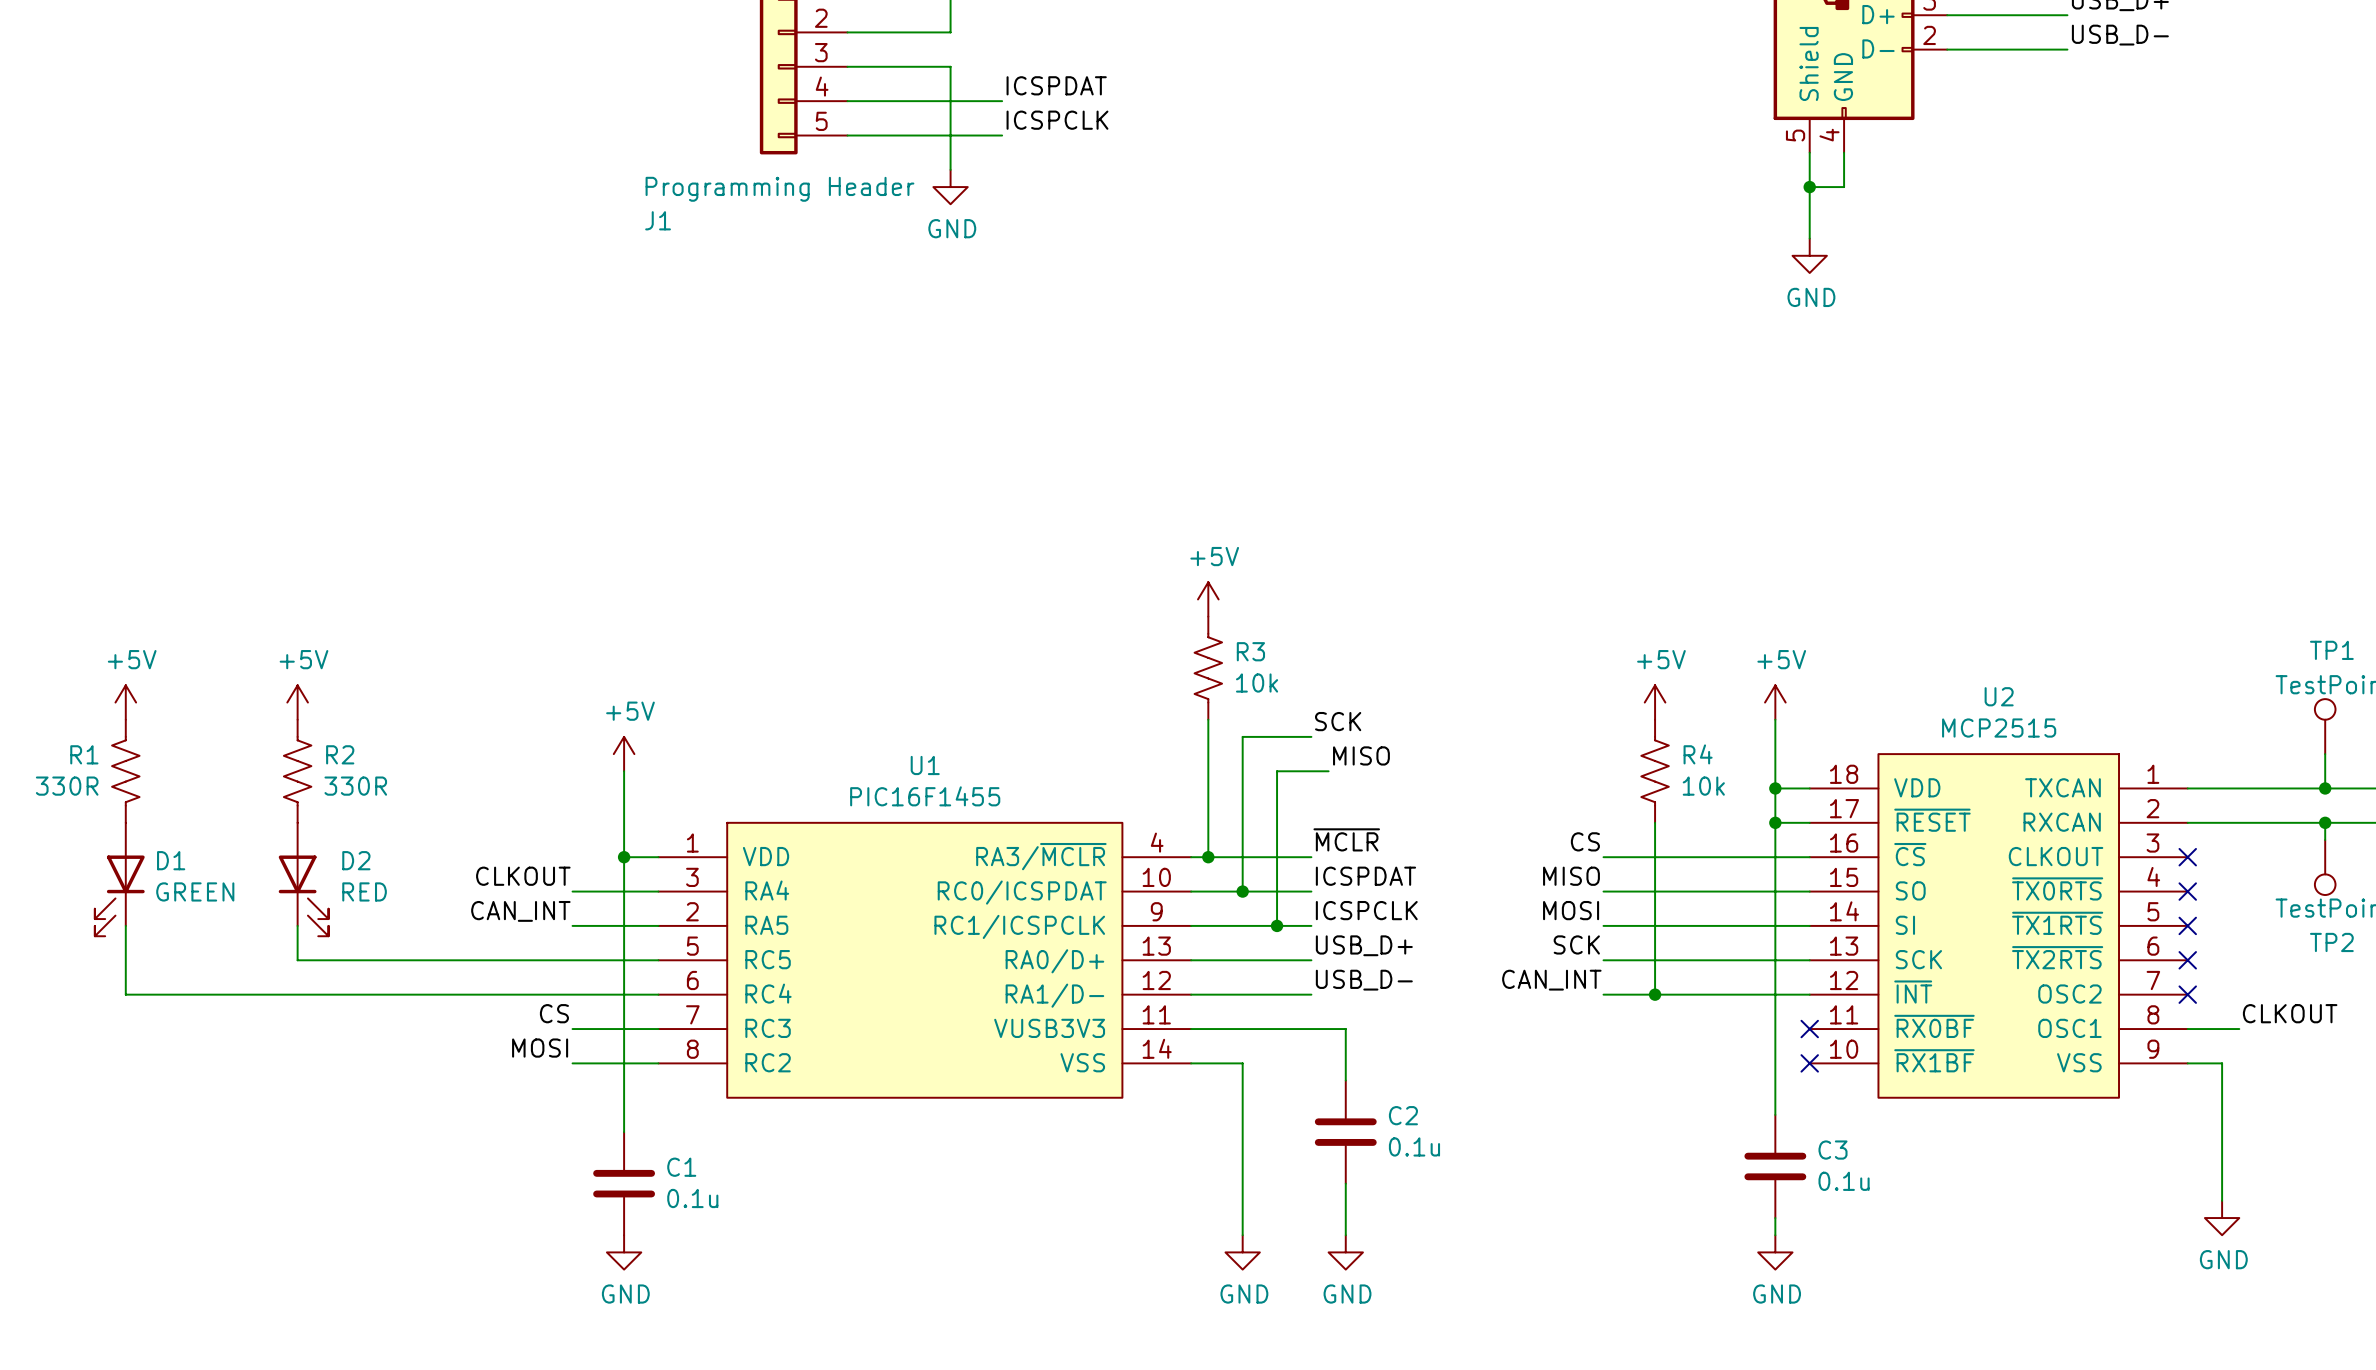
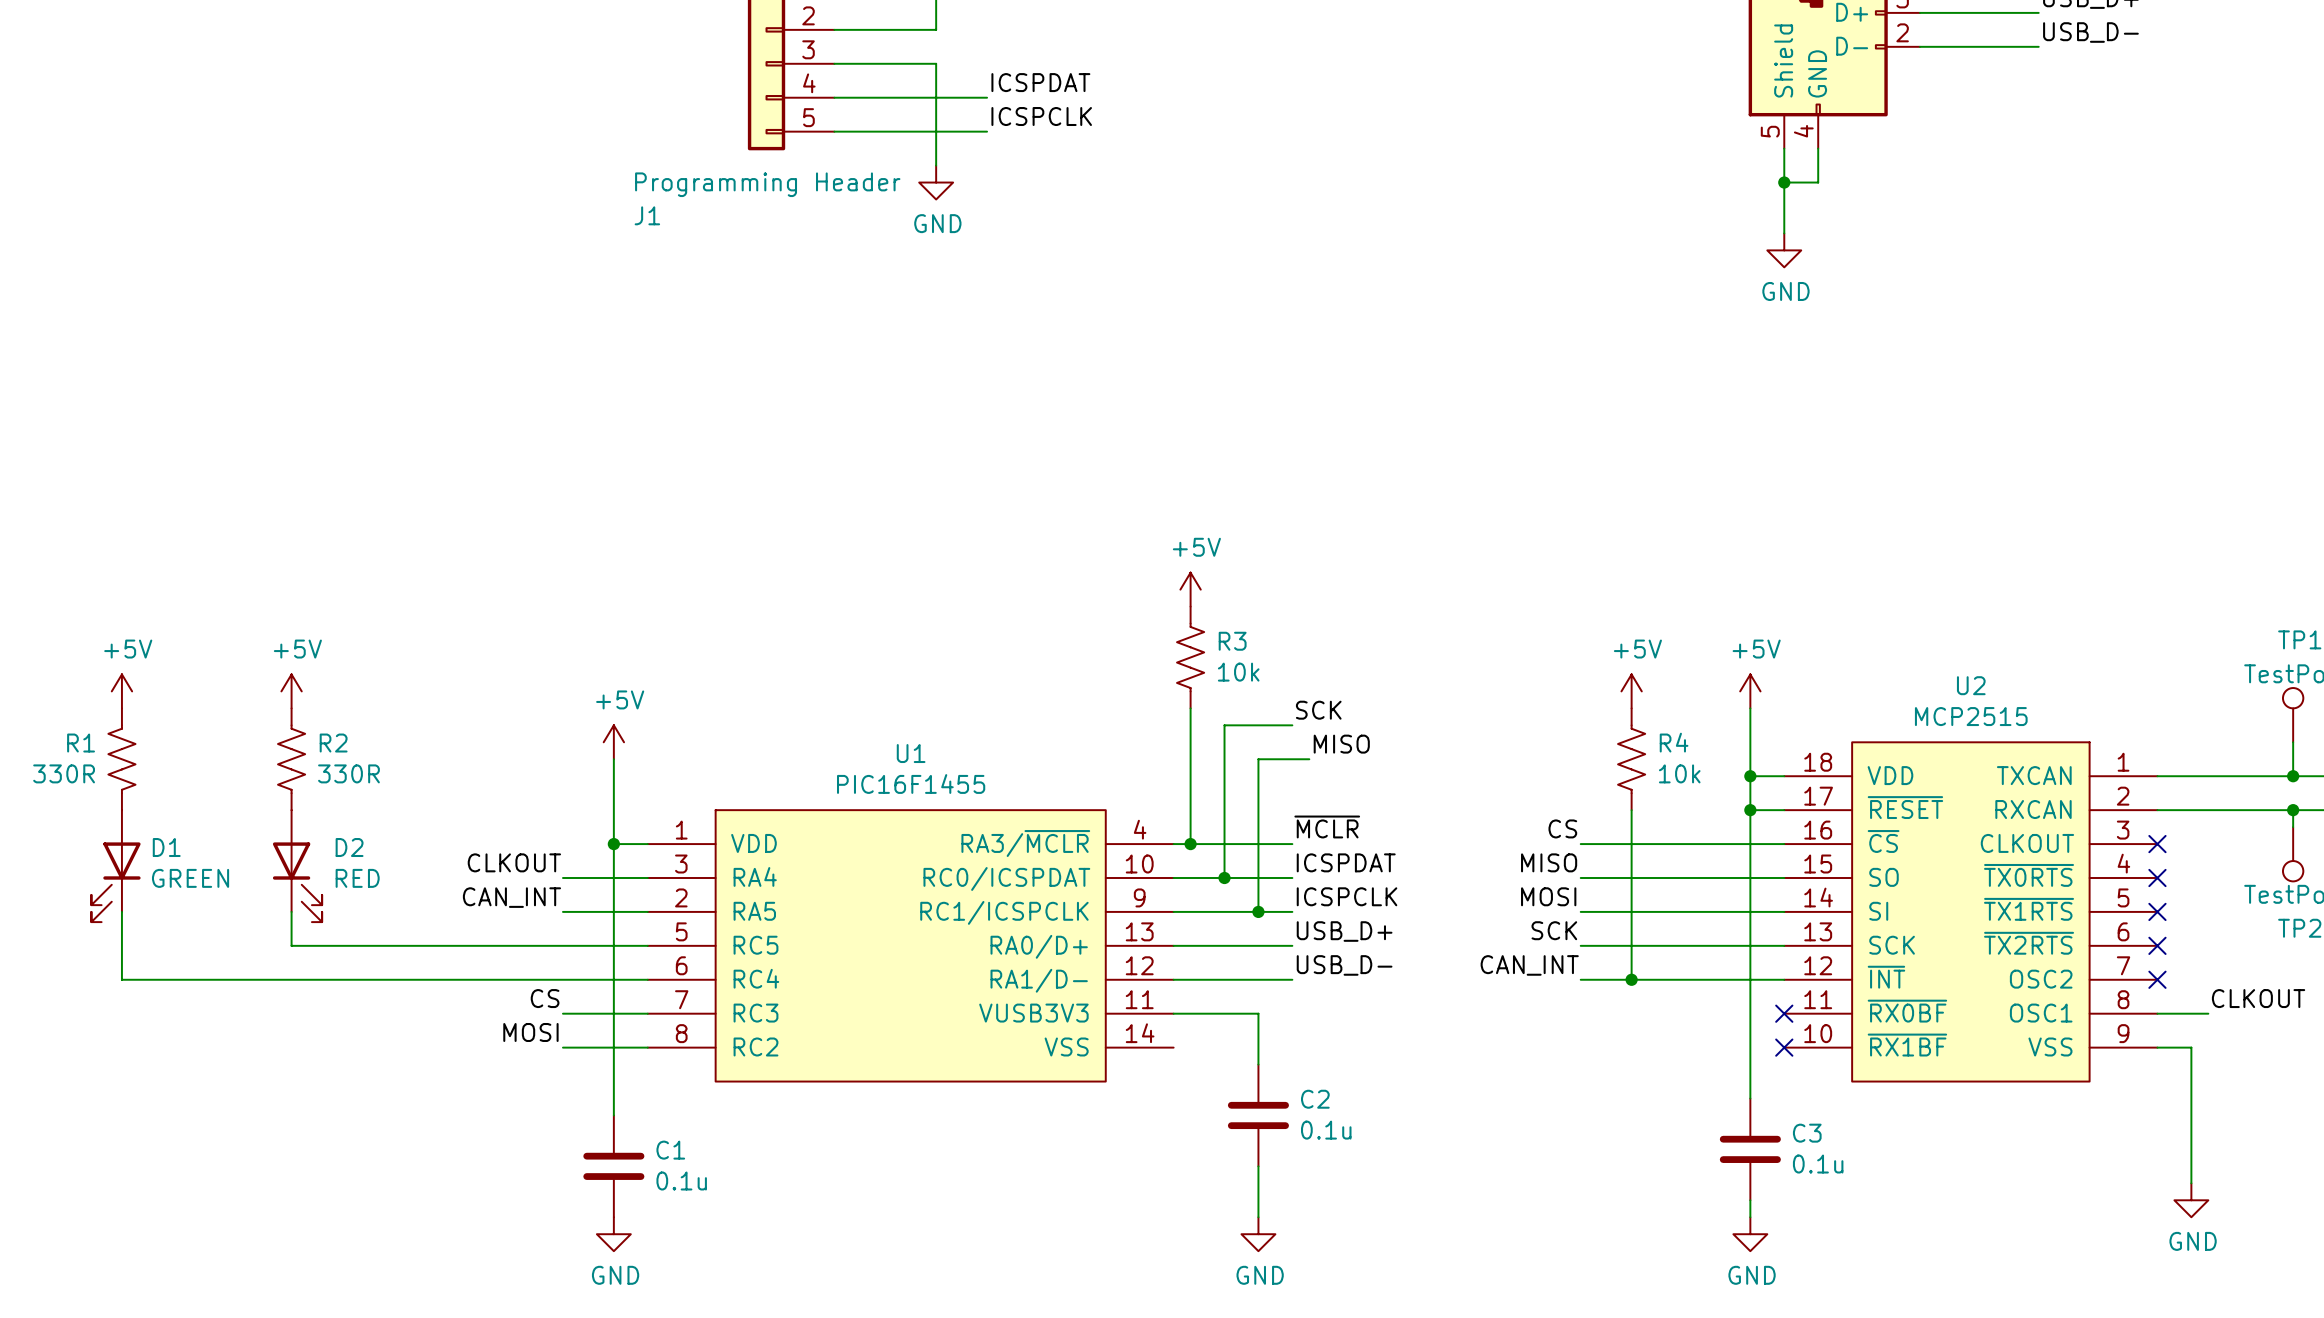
wire: (1277, 1029) (1345, 1029) (1345, 1080) -> (1258, 1013) (1258, 1064)
wire: (1191, 1063) (1242, 1063) (1242, 1235) -> none
C2 position: (1345, 1132) -> (1258, 1115)
wire: (1345, 1183) (1345, 1235) -> (1258, 1166) (1258, 1217)
power symbol: GND (1242, 1252) -> none
power symbol: none -> GND (1258, 1234)
power symbol: GND (1345, 1252) -> none

